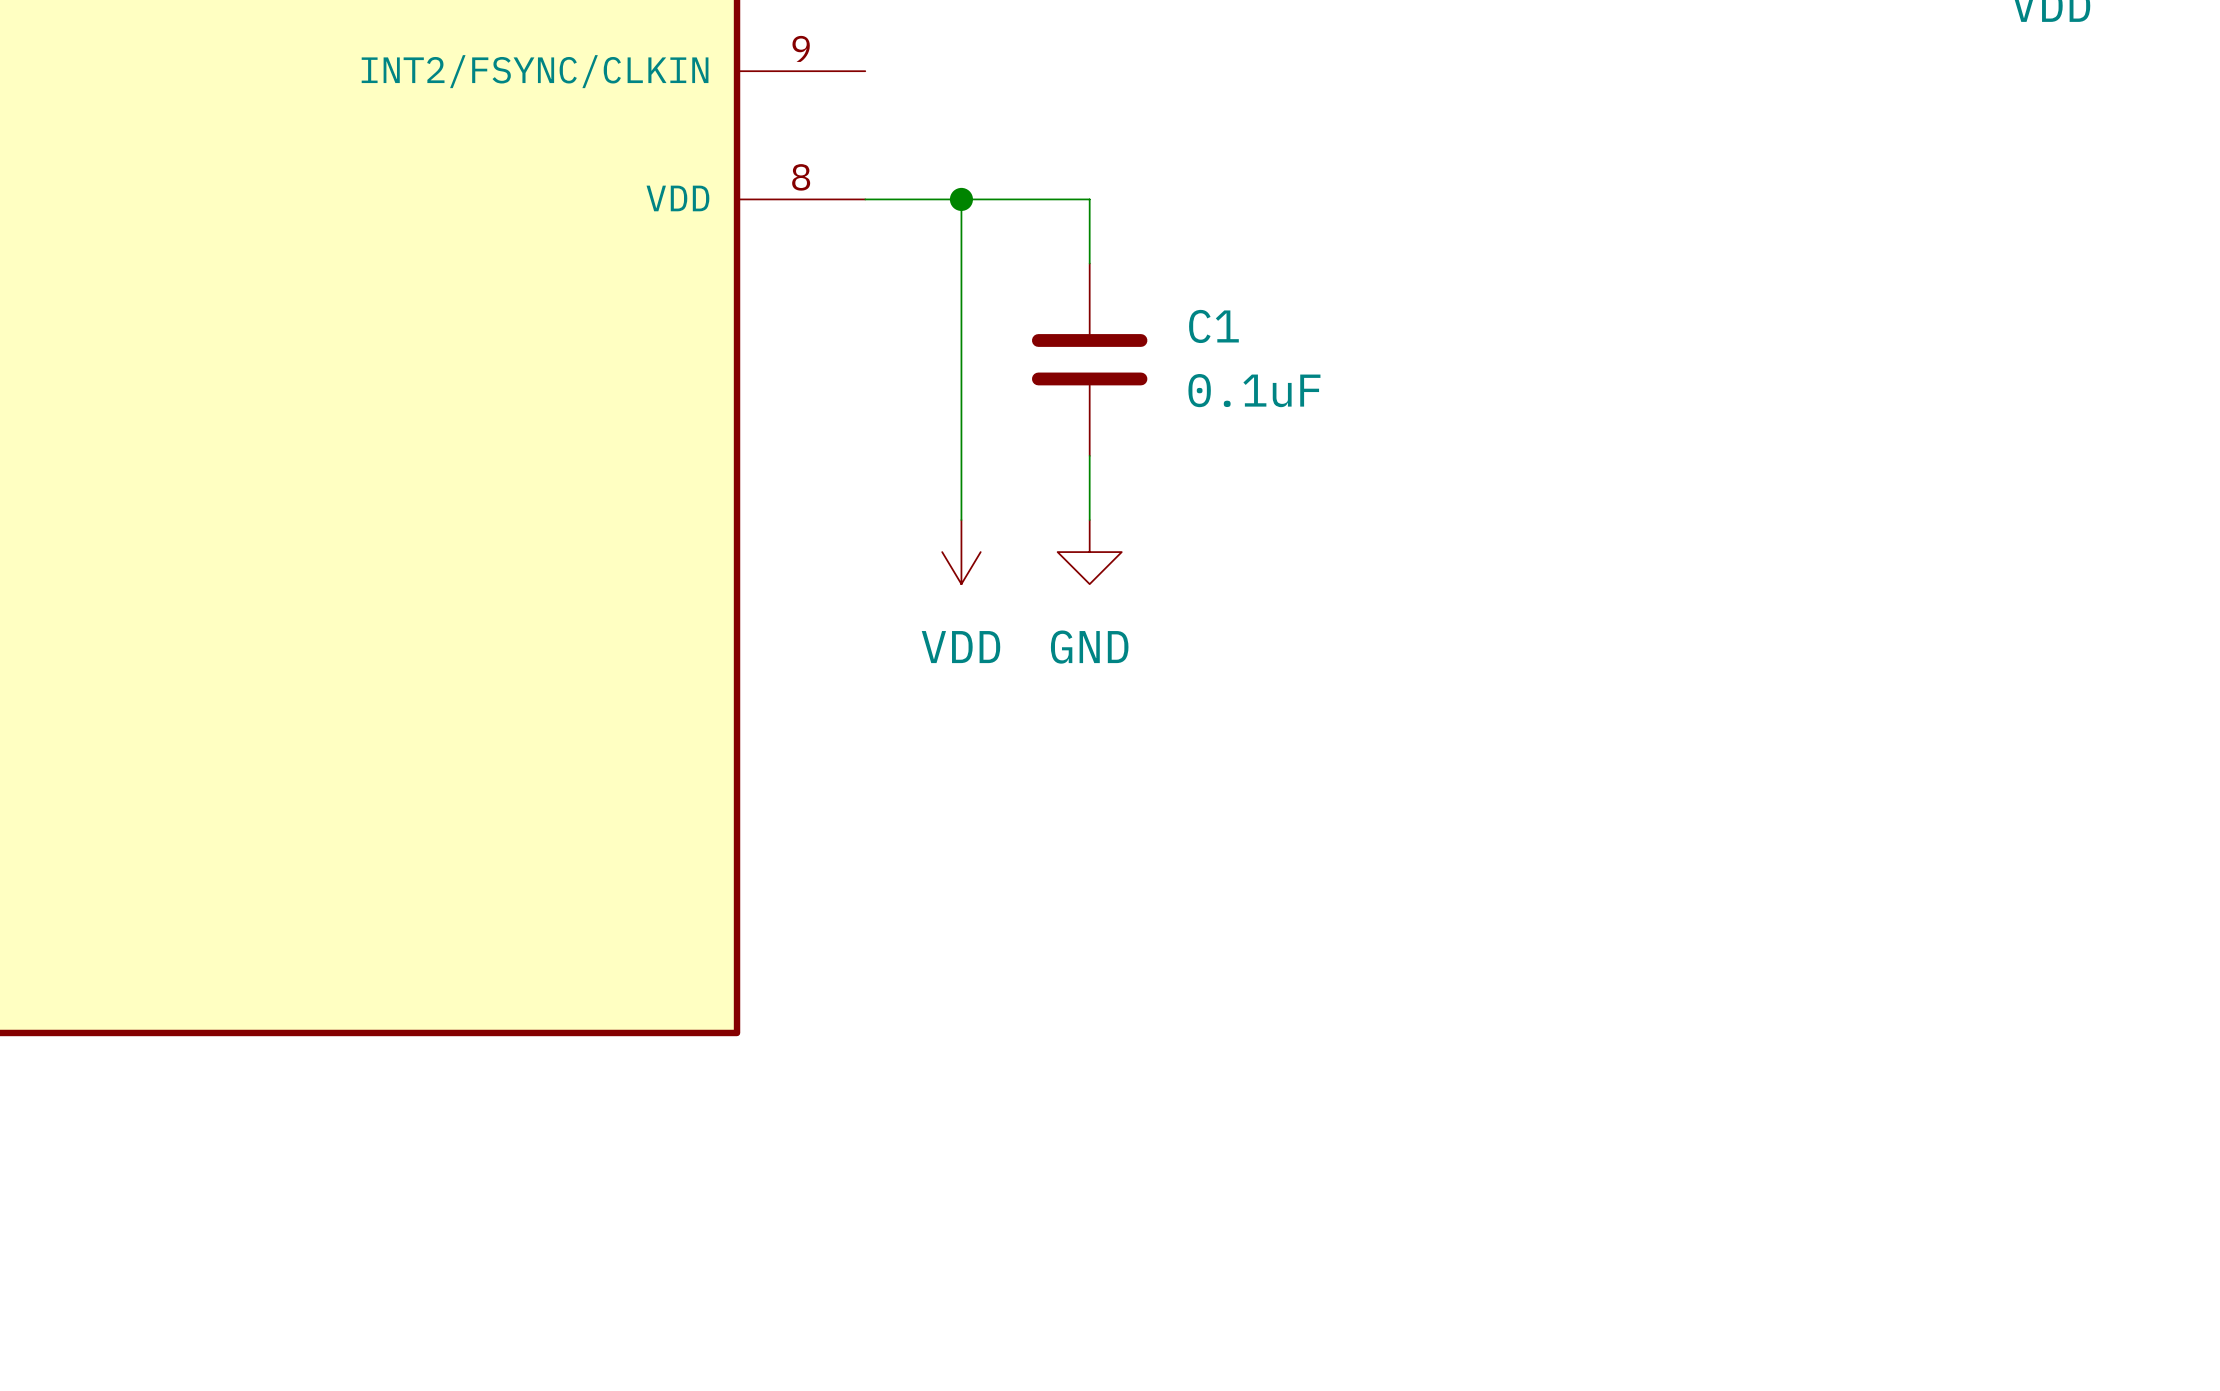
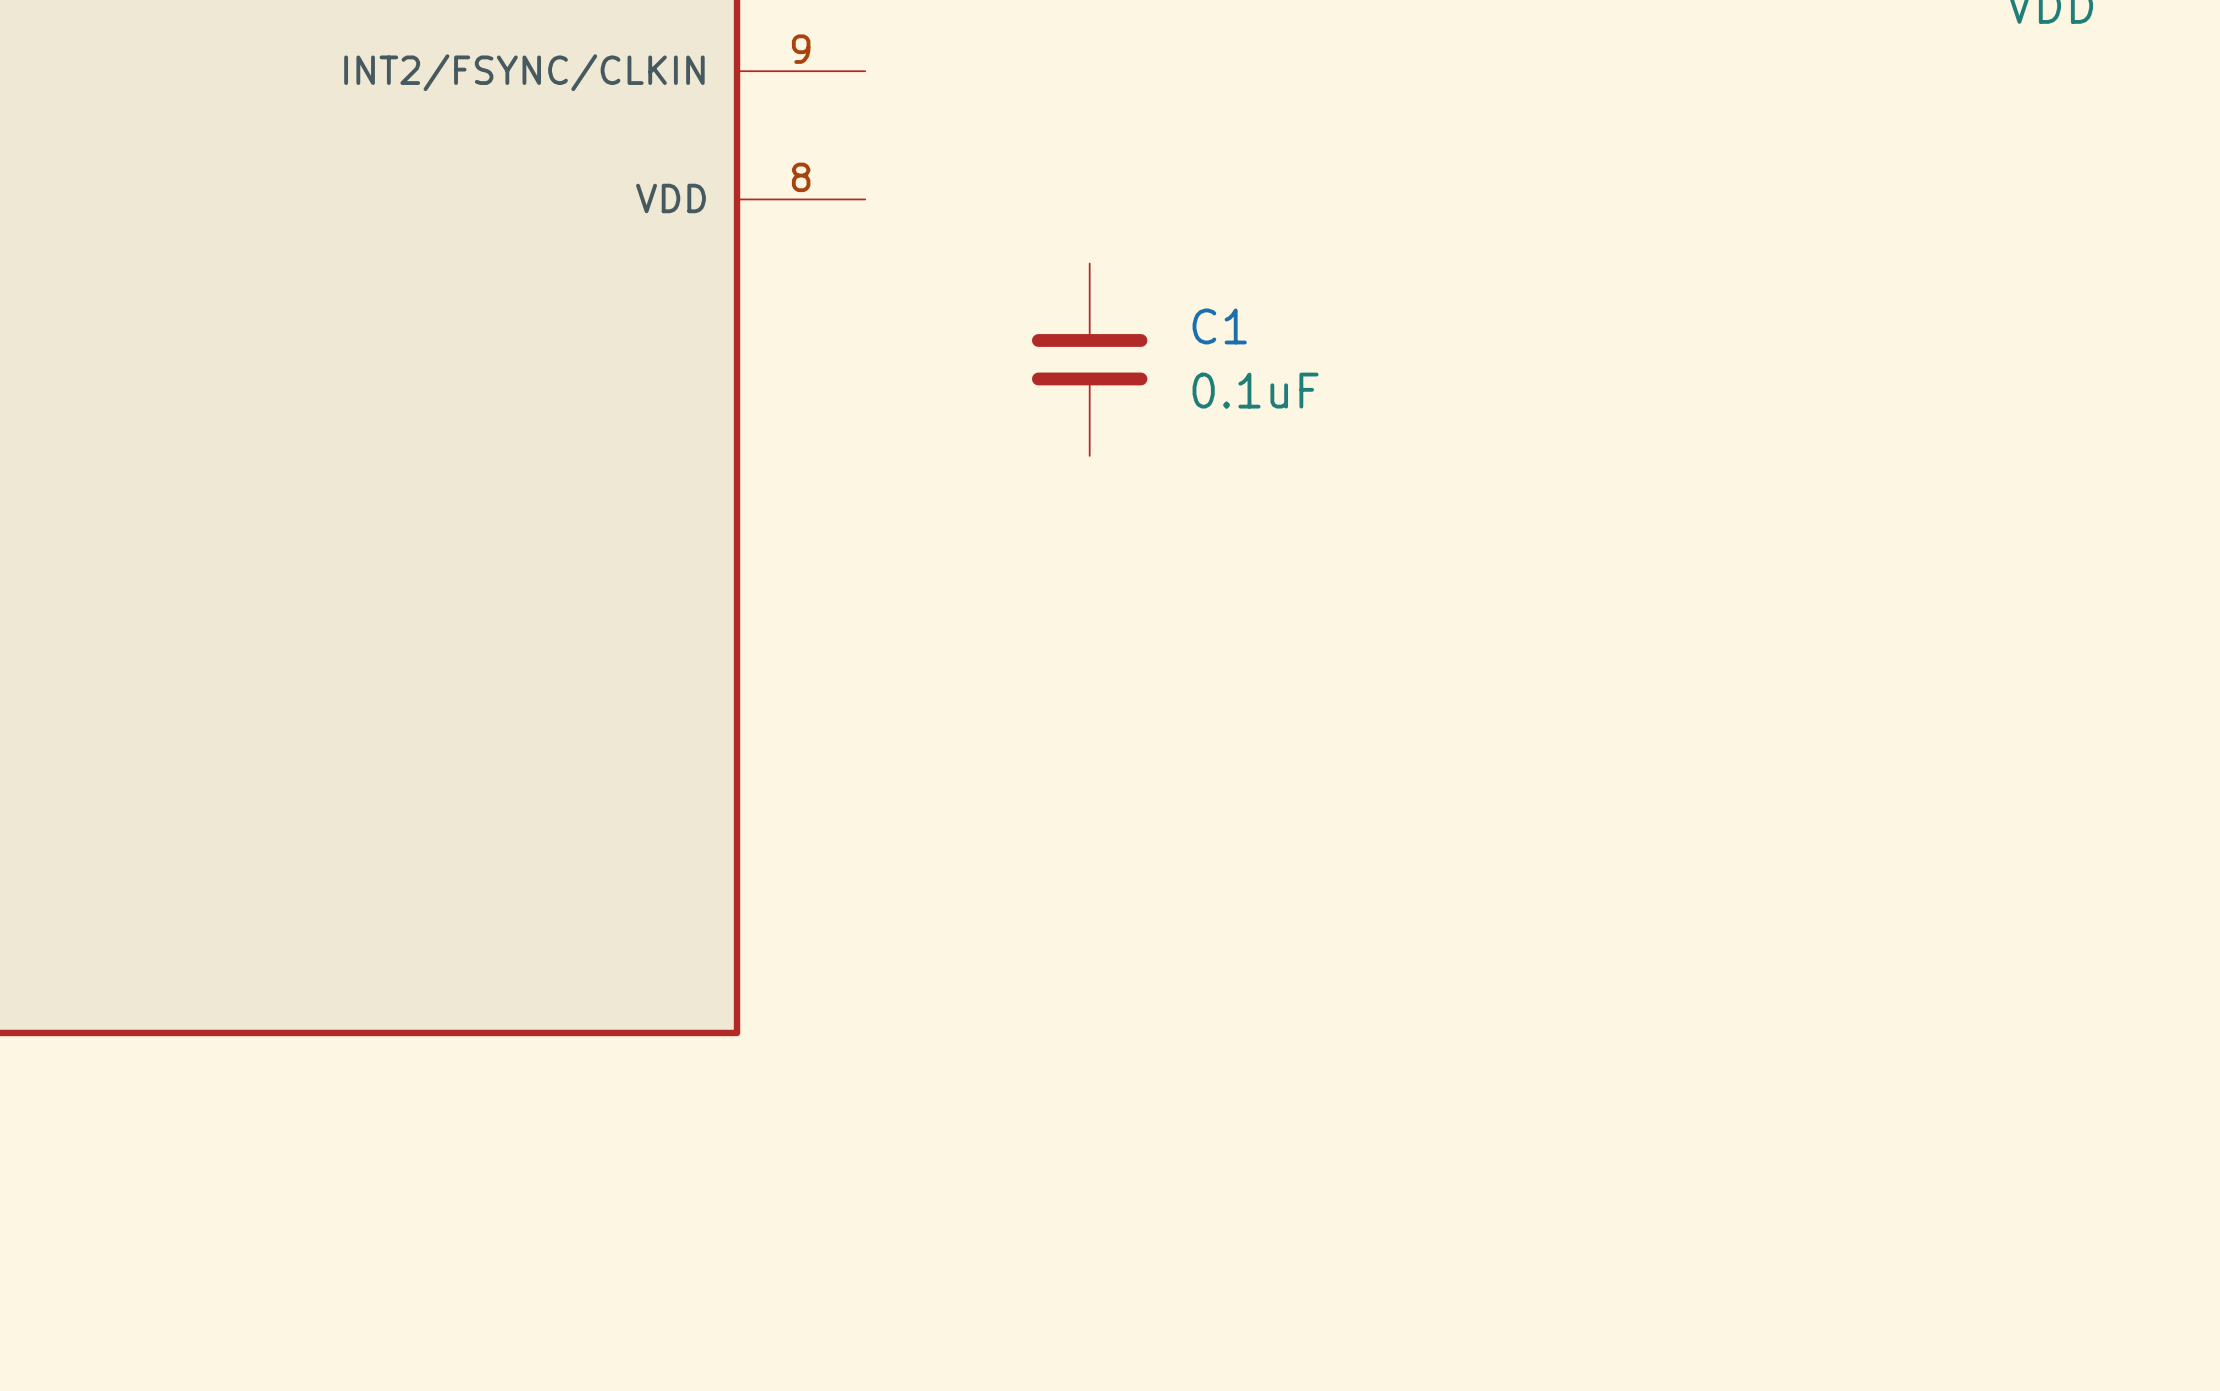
wire: (865, 199) (1089, 199) (1089, 263) -> none
wire: (961, 199) (961, 520) -> none
junction: (961, 199) -> none
wire: (1089, 455) (1089, 520) -> none
power symbol: VDD (961, 552) -> none
power symbol: GND (1089, 552) -> none

